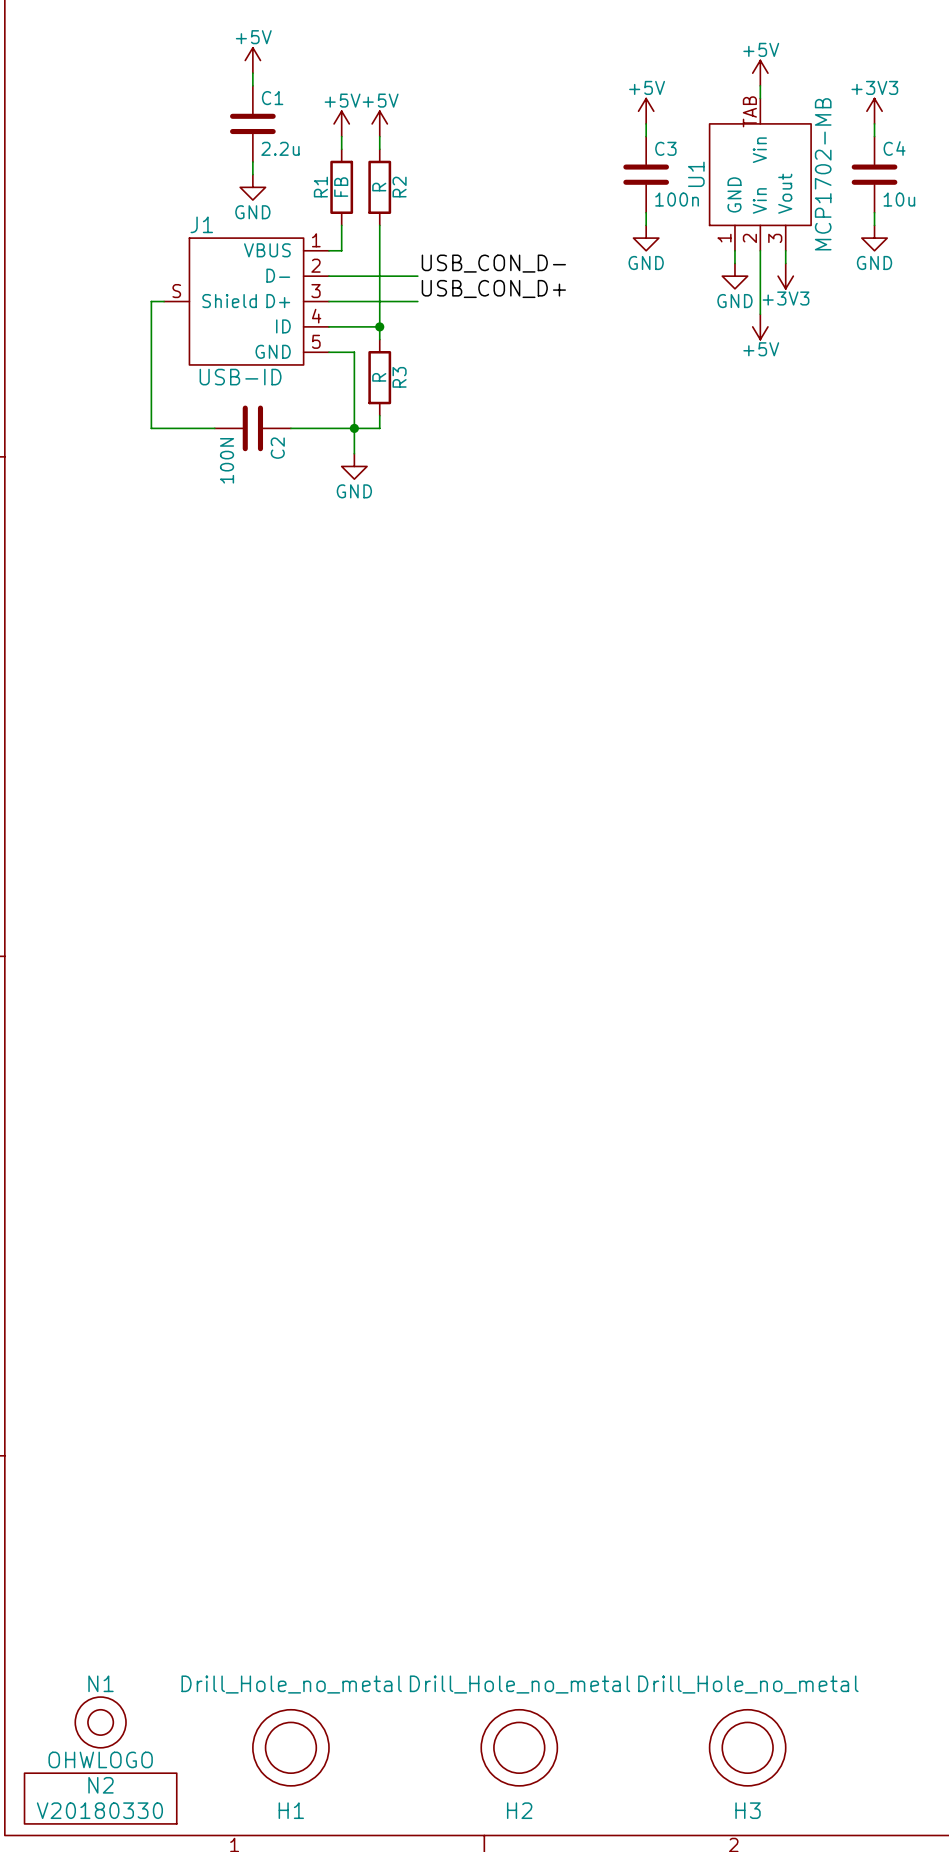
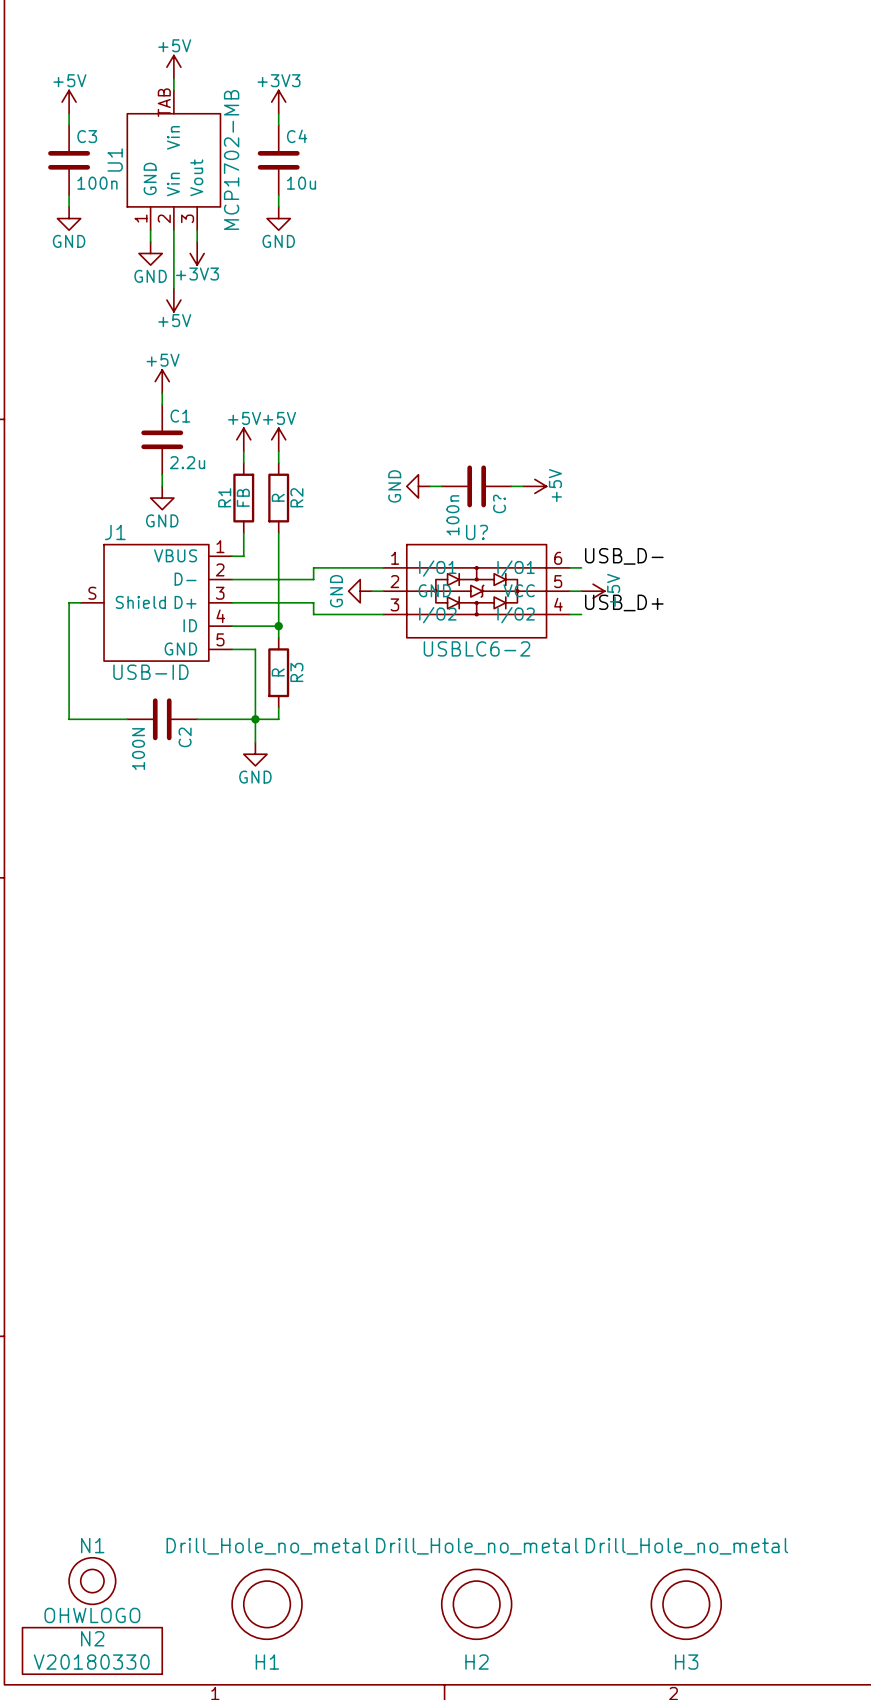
power symbol position: +5V (252, 60) -> +5V (173, 67)
wire: (252, 73) (252, 85) -> (278, 113) (278, 125)
power symbol: +5V (760, 73) -> none
wire: (760, 85) (760, 98) -> none
power symbol: none -> +5V (69, 102)
power symbol: none -> +3V3 (278, 102)
power symbol: +5V (646, 111) -> none
power symbol: +3V3 (874, 111) -> none
wire: none -> (69, 113) (69, 125)
C1 position: (252, 123) -> (162, 439)
power symbol: +5V (341, 123) -> none
power symbol: +5V (379, 123) -> none
wire: (646, 123) (646, 136) -> none
wire: (874, 123) (874, 136) -> none
wire: (341, 136) (341, 149) -> (173, 78) (173, 90)
wire: (379, 136) (379, 149) -> (197, 230) (197, 241)
wire: (252, 161) (252, 174) -> (278, 195) (278, 206)
C3 position: (646, 174) -> (69, 160)
U1 position: (760, 174) -> (173, 160)
C4 position: (874, 174) -> (278, 160)
power symbol: GND (252, 187) -> none
R1 position: (341, 187) -> (243, 498)
R2 position: (379, 187) -> (278, 498)
wire: none -> (69, 195) (69, 206)
wire: (646, 212) (646, 225) -> none
wire: (874, 212) (874, 225) -> none
wire: (341, 225) (341, 250) (328, 250) -> none
wire: (379, 225) (379, 339) -> none
power symbol: none -> GND (69, 218)
power symbol: none -> GND (278, 218)
power symbol: GND (646, 238) -> none
power symbol: GND (874, 238) -> none
wire: none -> (150, 230) (150, 241)
wire: (734, 250) (734, 263) -> none
wire: (760, 250) (760, 314) -> none
wire: (785, 250) (785, 263) -> none
label: USB_CON_D- (493, 263) -> none
power symbol: none -> GND (150, 253)
power symbol: none -> +3V3 (197, 253)
wire: (328, 276) (417, 276) -> none
power symbol: GND (734, 276) -> none
power symbol: +3V3 (785, 276) -> none
label: USB_CON_D+ (493, 288) -> none
wire: (164, 301) (151, 301) (151, 428) (214, 428) -> none
J1 position: (246, 301) -> (156, 602)
wire: (328, 301) (417, 301) -> none
power symbol: none -> +5V (173, 300)
wire: (328, 326) (379, 326) -> none
junction: (379, 326) -> none
power symbol: +5V (760, 326) -> none
wire: (328, 352) (354, 352) (354, 453) -> none
R3 position: (379, 377) -> (278, 672)
power symbol: none -> +5V (162, 381)
wire: (379, 415) (379, 428) (290, 428) -> none
wire: none -> (162, 393) (162, 404)
C2 position: (252, 428) -> (162, 719)
junction: (354, 428) -> none
power symbol: GND (354, 466) -> none
power symbol: none -> +5V (243, 439)
power symbol: none -> +5V (278, 439)
wire: none -> (243, 451) (243, 463)
wire: none -> (278, 451) (278, 463)
wire: none -> (162, 474) (162, 486)
power symbol: none -> GND (418, 486)
wire: none -> (430, 486) (441, 486)
C?: none -> 100n (476, 486)
wire: none -> (511, 486) (523, 486)
power symbol: none -> +5V (534, 486)
power symbol: none -> GND (162, 498)
wire: none -> (243, 532) (243, 556) (232, 556)
wire: none -> (278, 532) (278, 637)
label: none -> USB_D- (624, 556)
wire: none -> (383, 567) (313, 567) (313, 579) (232, 579)
wire: none -> (569, 567) (581, 567)
power symbol: none -> GND (360, 591)
wire: none -> (371, 591) (383, 591)
U?: none -> USBLC6-2 (476, 591)
wire: none -> (569, 591) (581, 591)
power symbol: none -> +5V (593, 591)
wire: none -> (80, 602) (69, 602) (69, 719) (127, 719)
wire: none -> (232, 602) (313, 602) (313, 614) (383, 614)
label: none -> USB_D+ (624, 602)
wire: none -> (569, 614) (581, 614)
wire: none -> (232, 626) (278, 626)
junction: none -> (278, 626)
wire: none -> (232, 649) (255, 649) (255, 742)
wire: none -> (278, 707) (278, 719) (197, 719)
junction: none -> (255, 719)
power symbol: none -> GND (255, 754)

